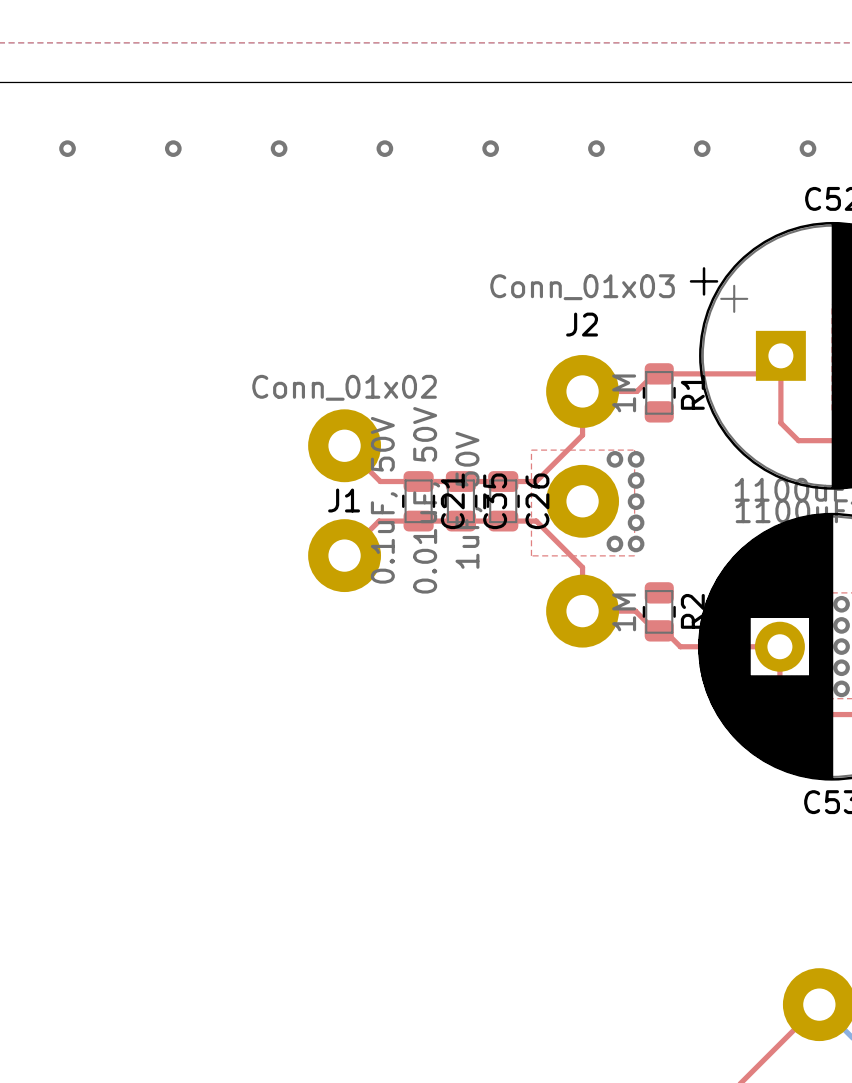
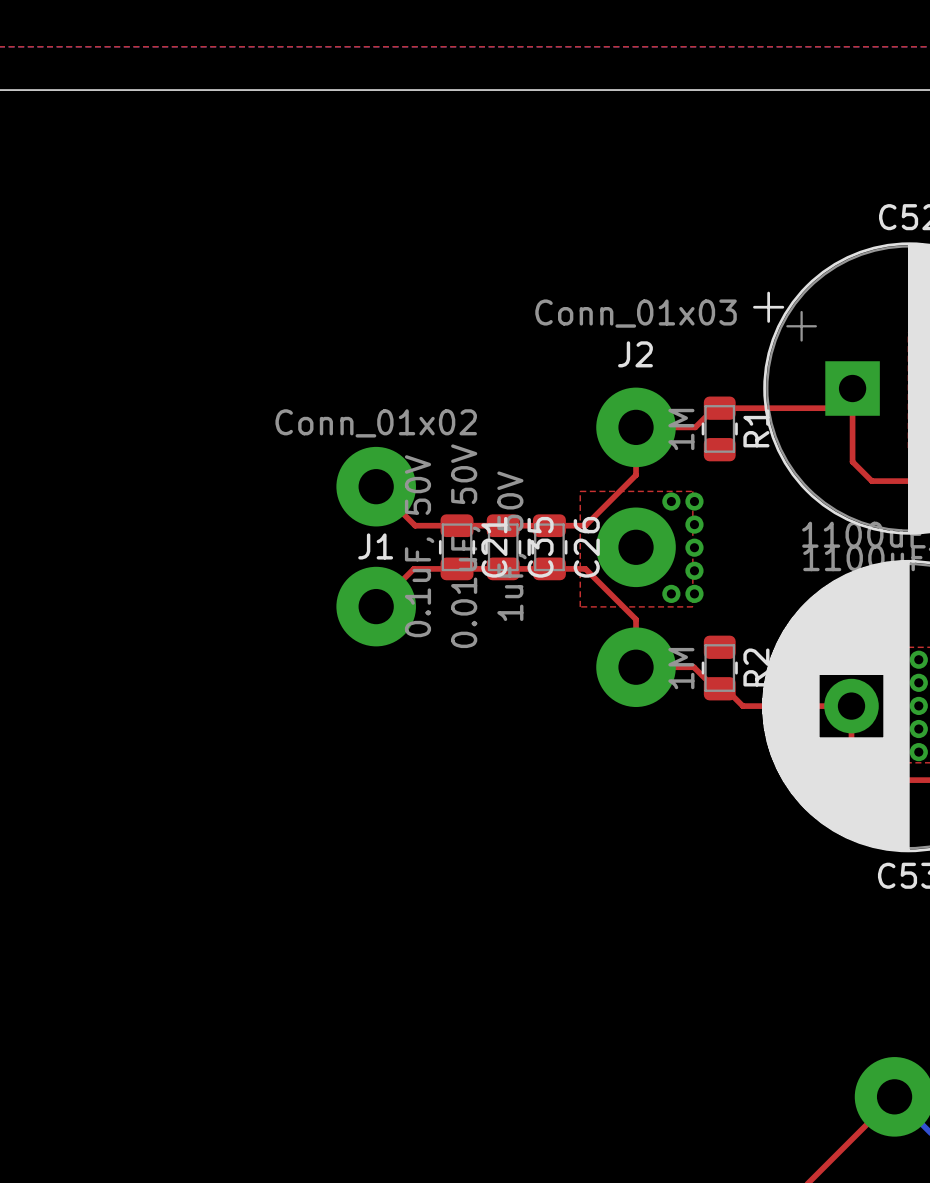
via: (67, 148) -> none
via: (173, 148) -> none
via: (279, 148) -> none
via: (384, 148) -> none
via: (490, 148) -> none
via: (596, 148) -> none
via: (702, 148) -> none
via: (807, 148) -> none

